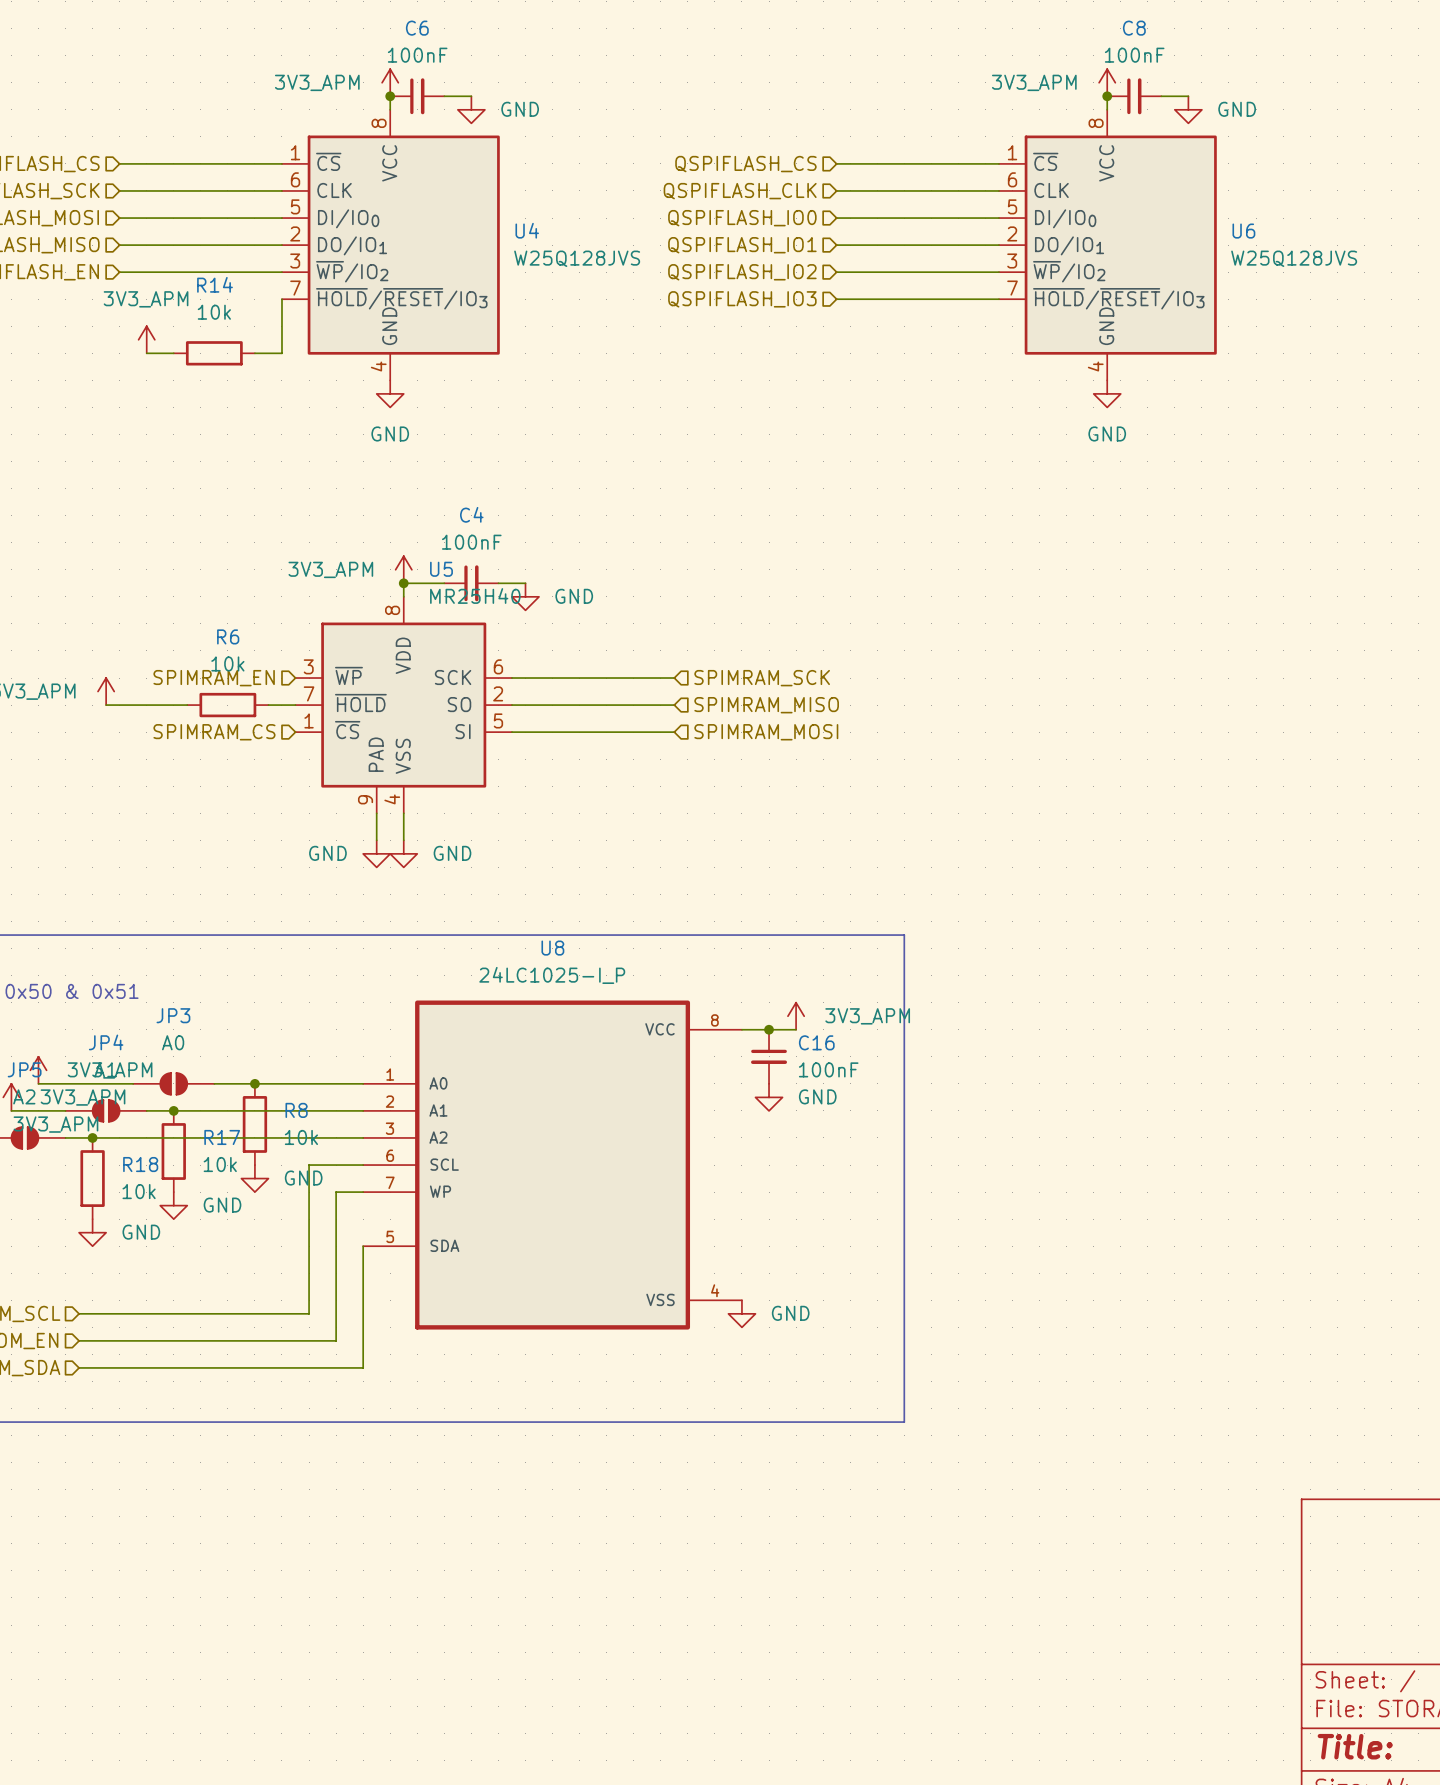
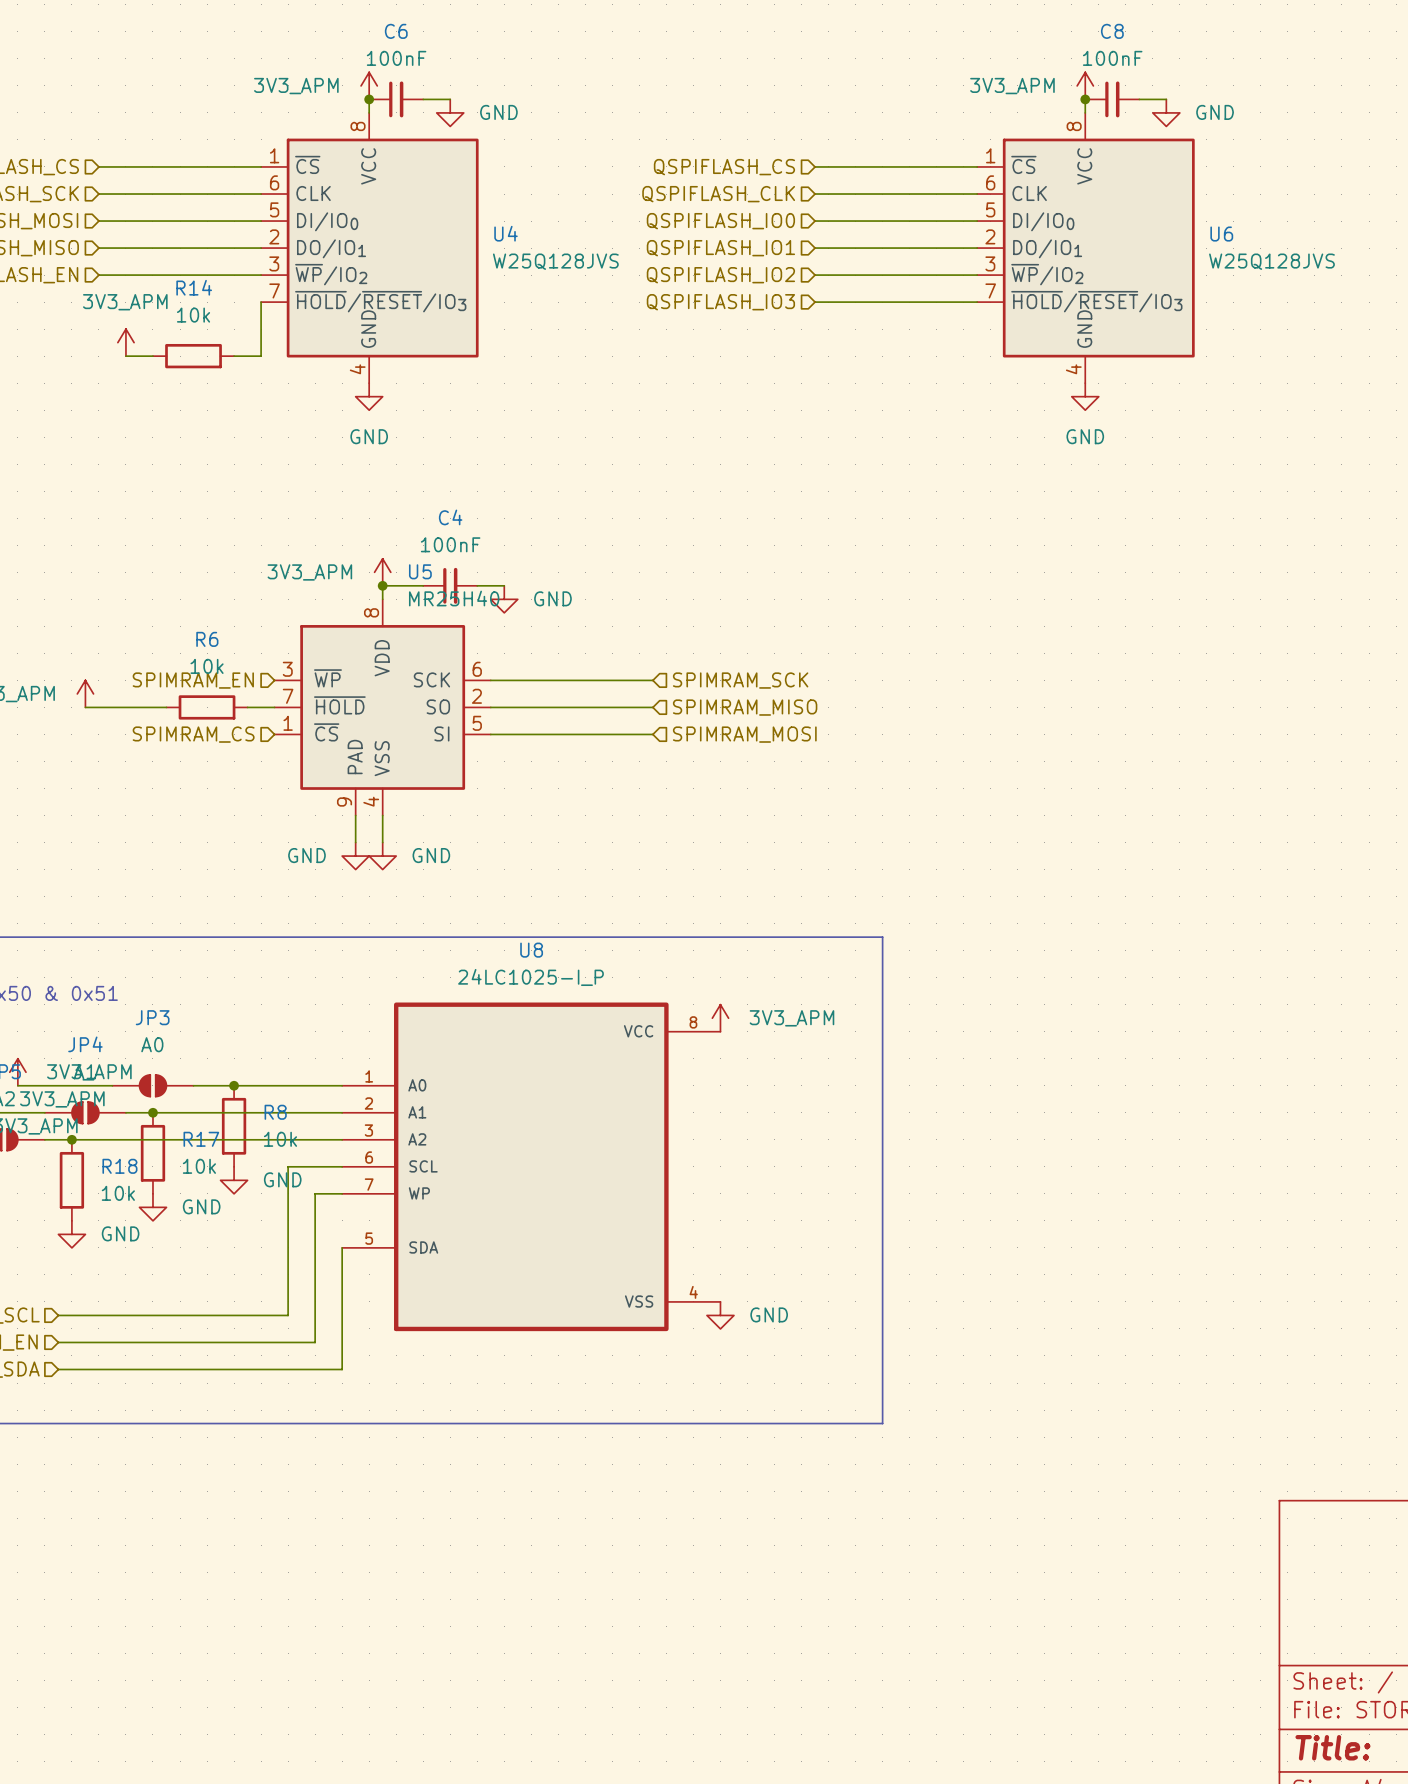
power symbol position: 3V3_APM (796, 1016) -> 3V3_APM (720, 1018)
wire: (741, 1029) (796, 1029) -> none
junction: (769, 1029) -> none
C16: 100nF (769, 1056) -> none
power symbol: GND (769, 1097) -> none

